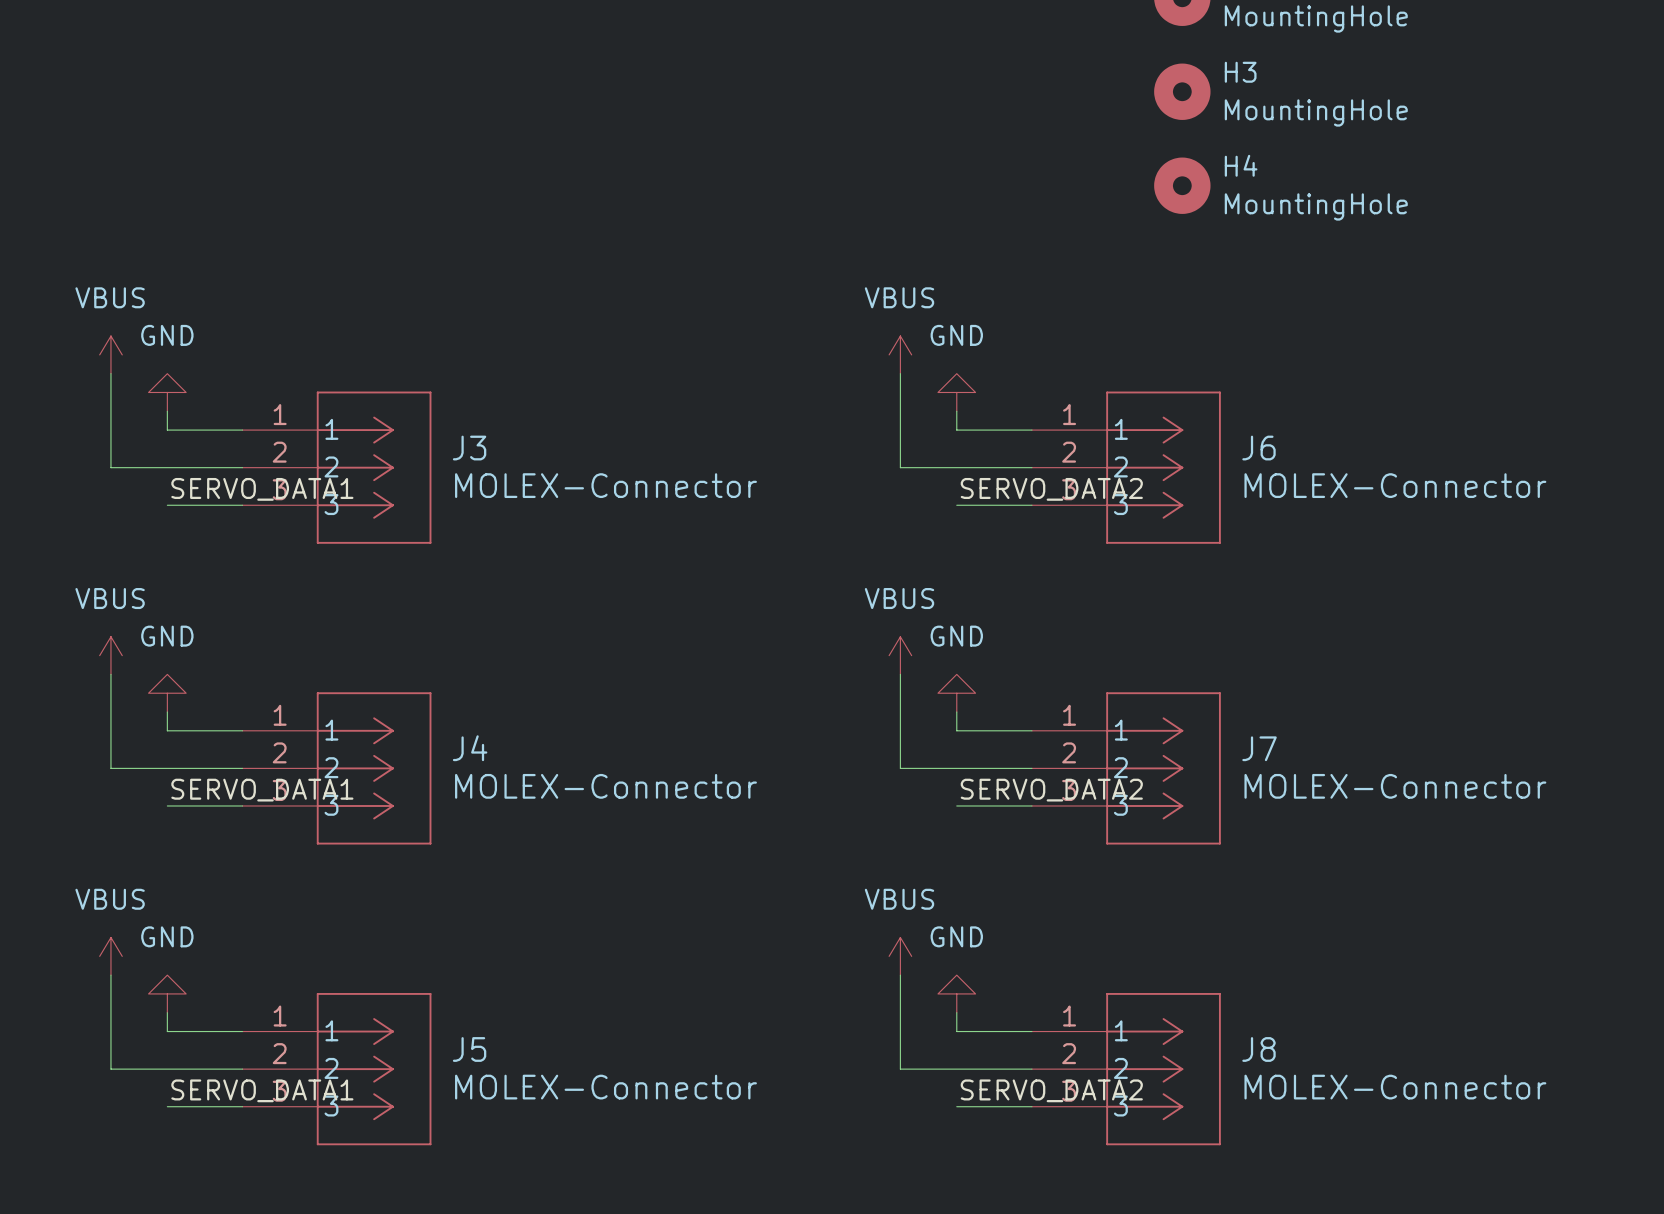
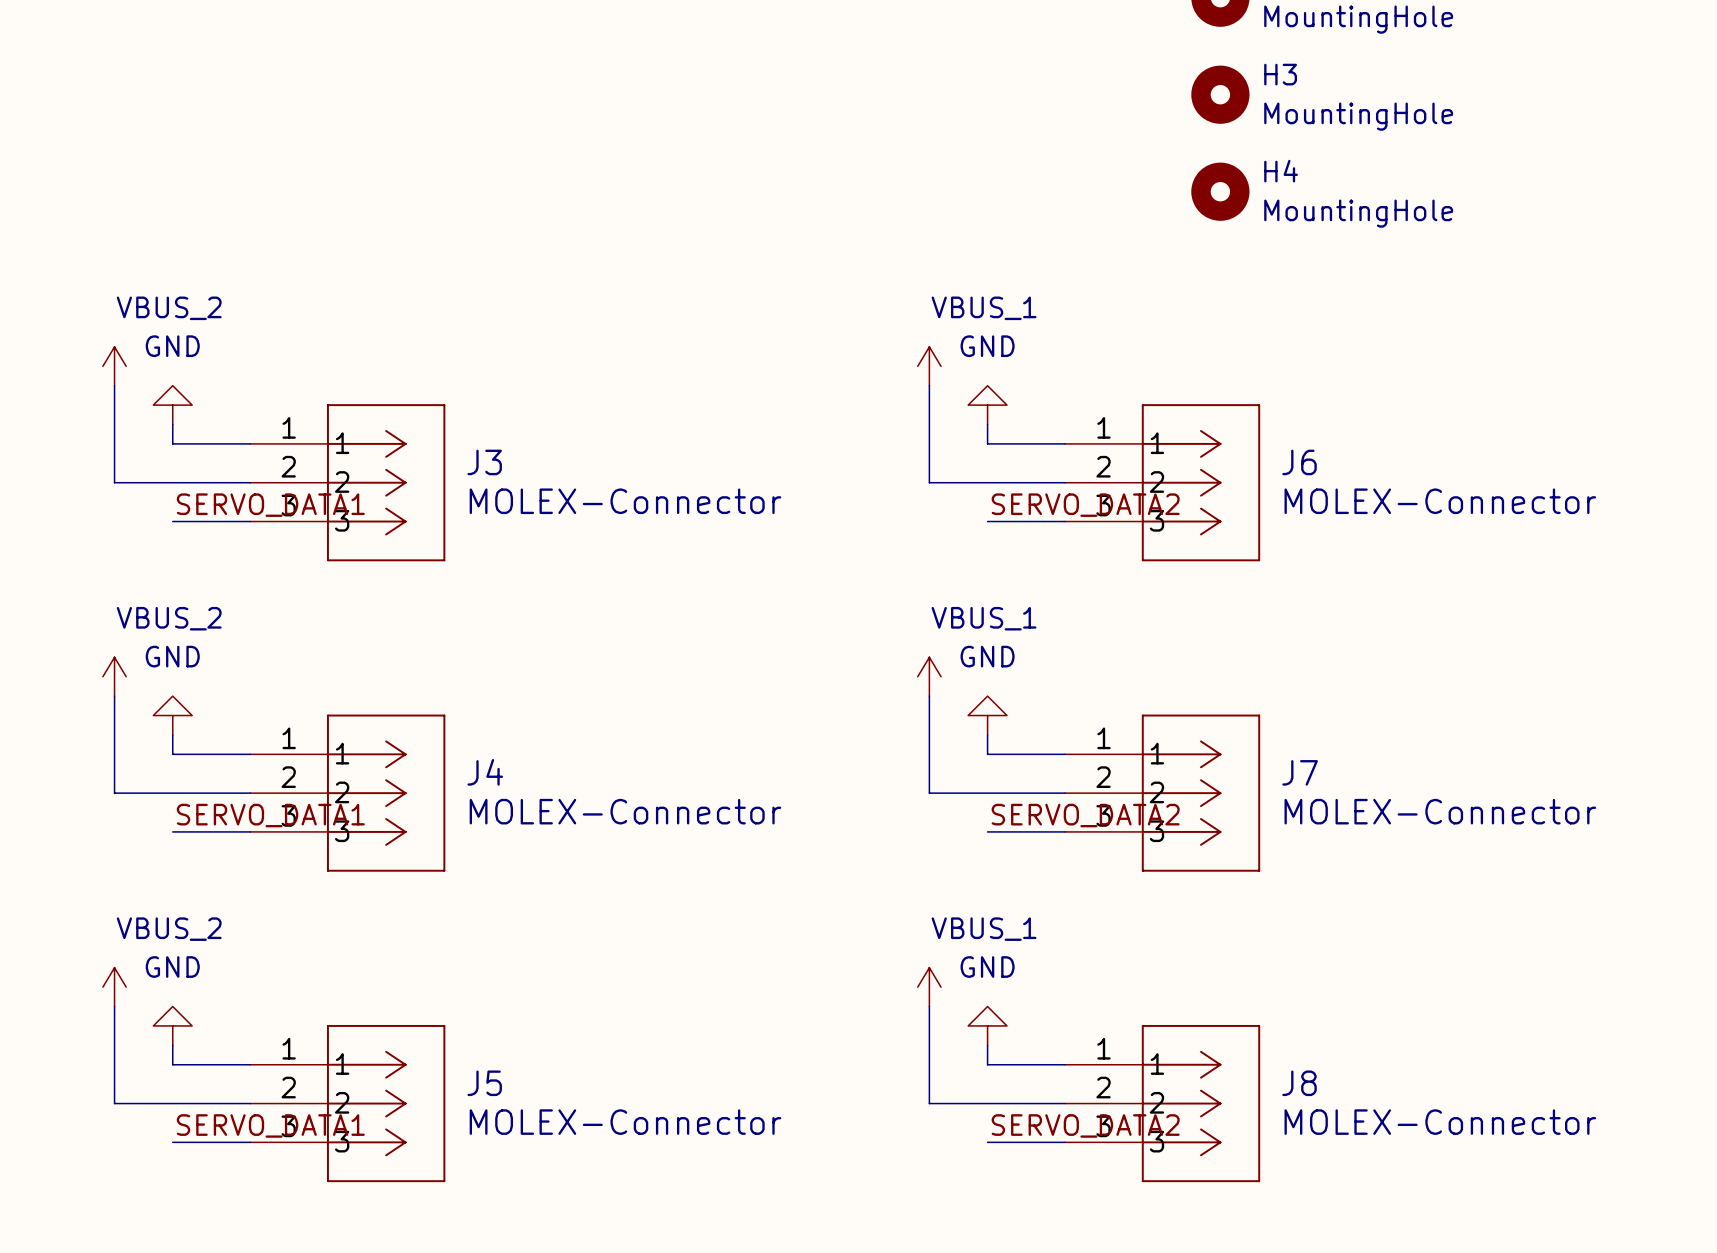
power symbol: VBUS (110, 354) -> VBUS_2 (114, 366)
power symbol: VBUS (900, 354) -> VBUS_1 (929, 366)
power symbol: VBUS (110, 655) -> VBUS_2 (114, 676)
power symbol: VBUS (900, 655) -> VBUS_1 (929, 676)
power symbol: VBUS (110, 956) -> VBUS_2 (114, 987)
power symbol: VBUS (900, 956) -> VBUS_1 (929, 987)

